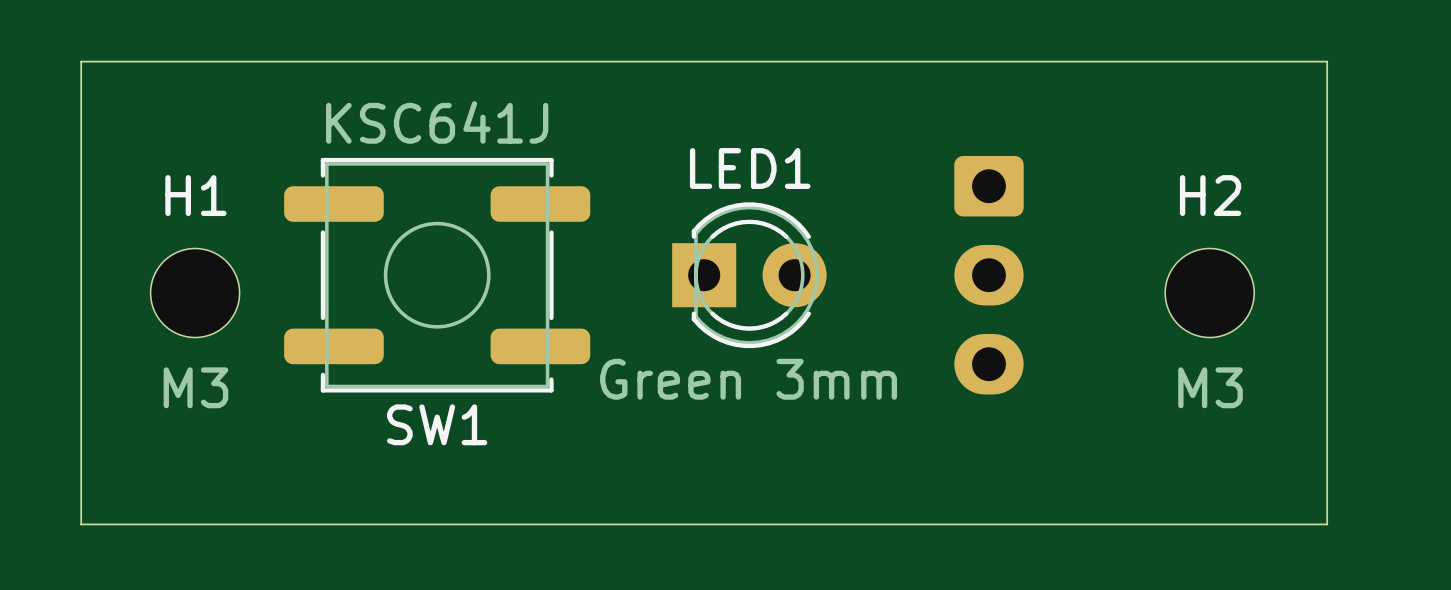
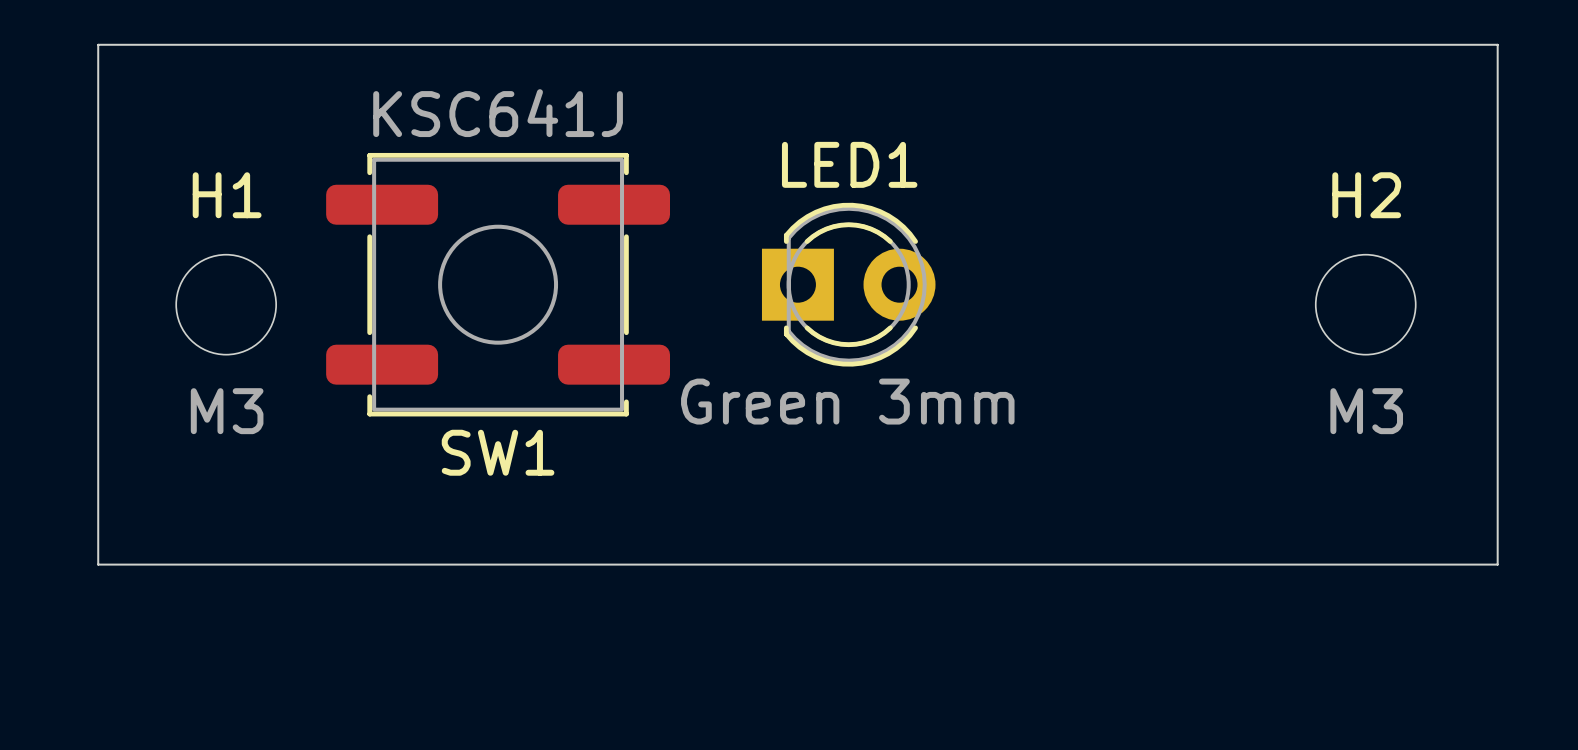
part: (988, 275) -> none

